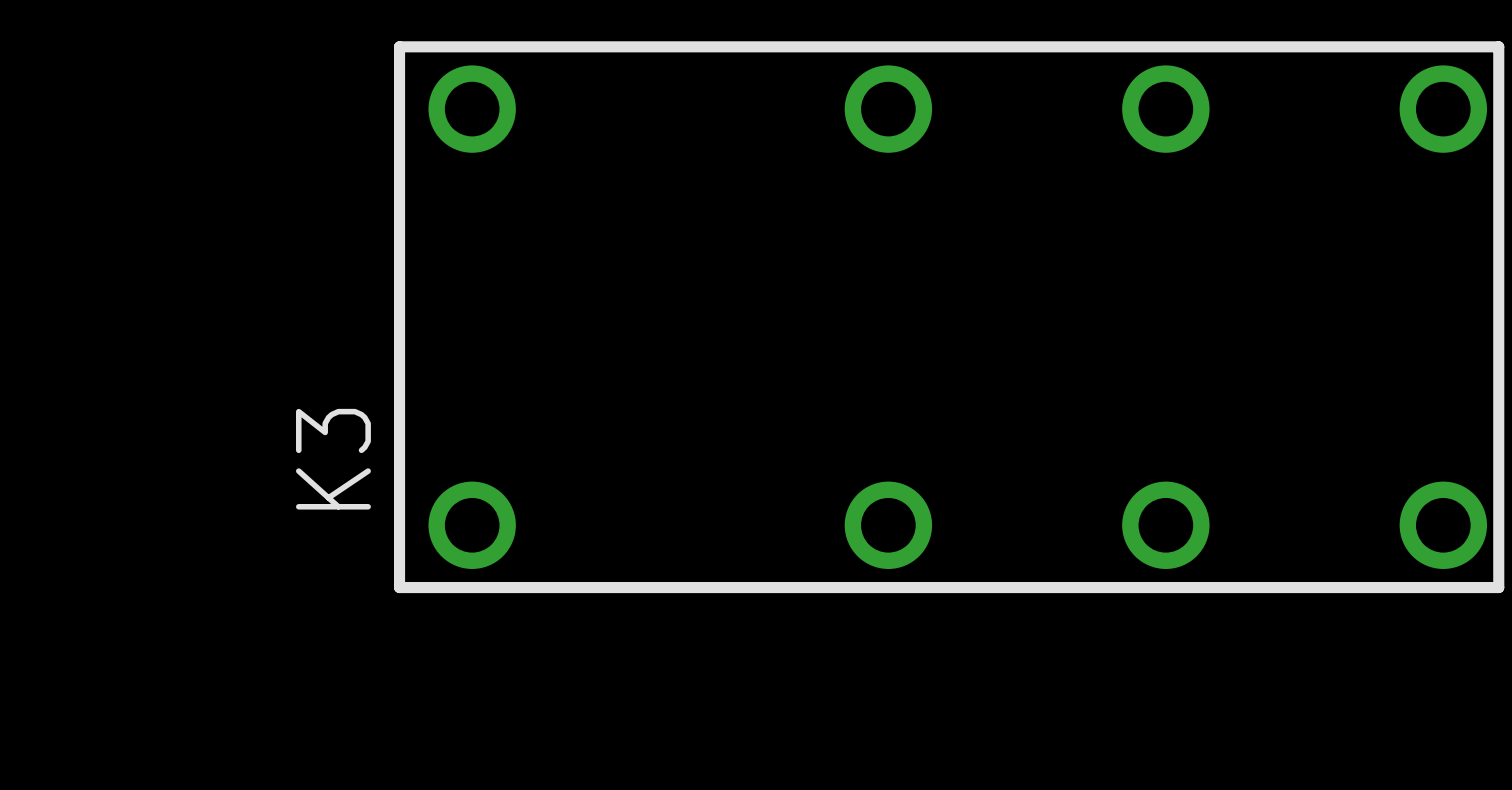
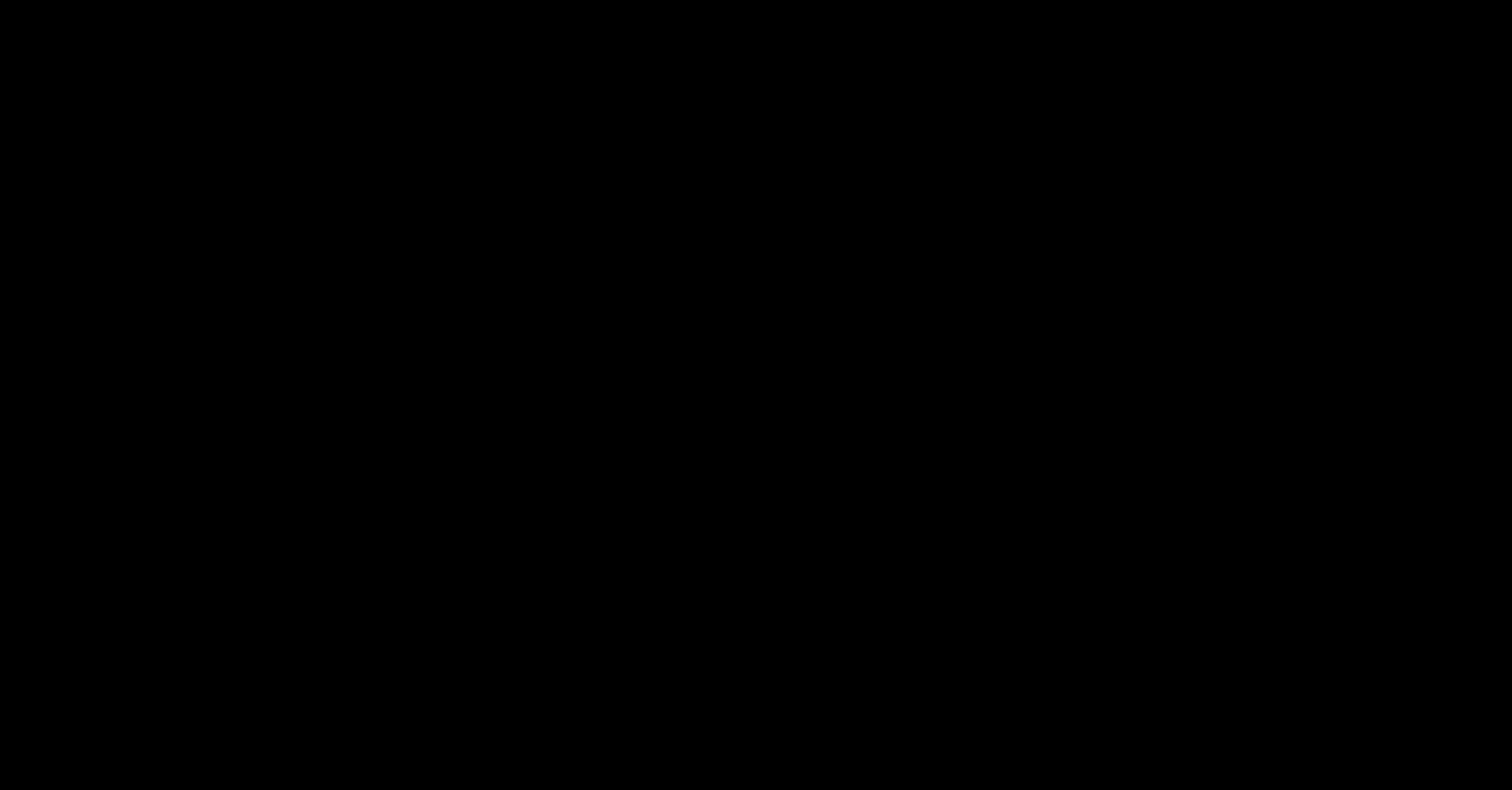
K3: (949, 317) -> none

